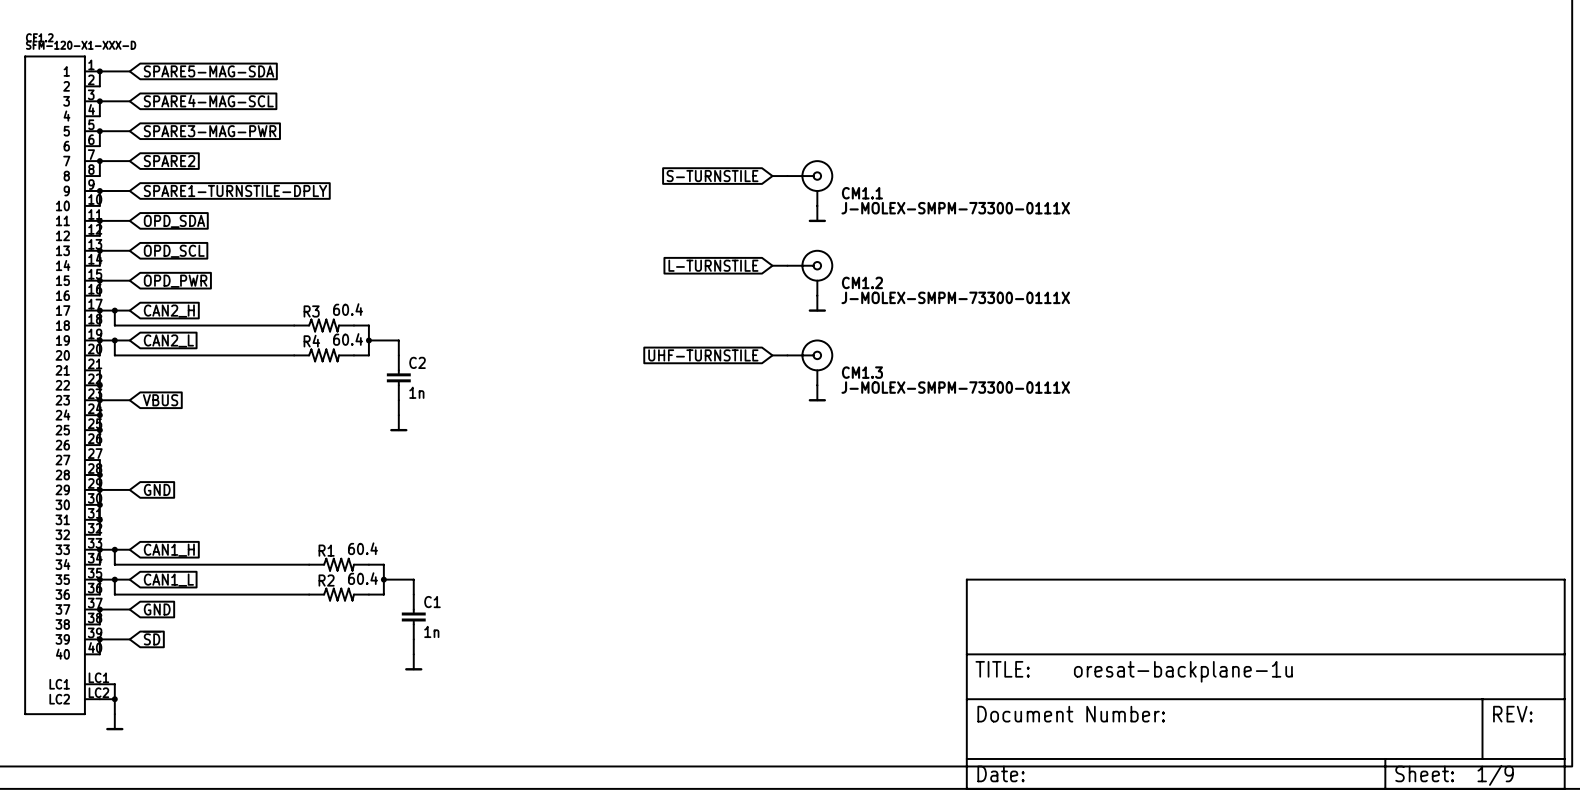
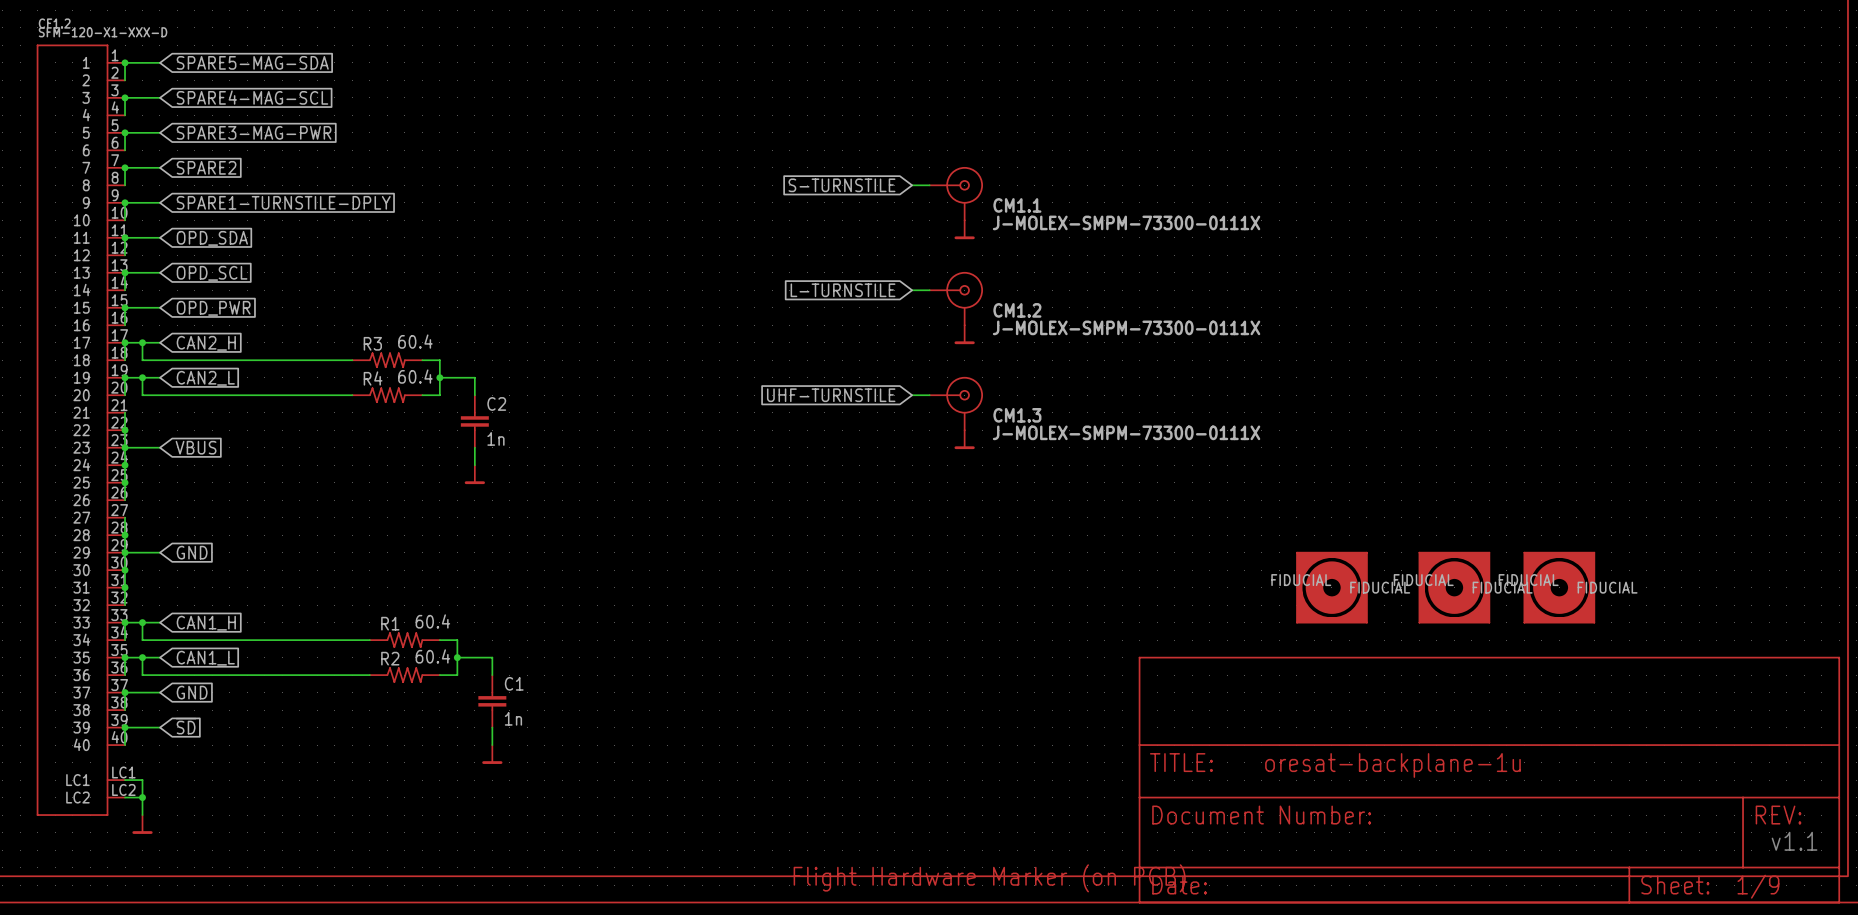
part: none -> (1331, 587)
part: none -> (1454, 587)
part: none -> (1559, 587)
text: none -> v1.1 (1794, 841)
part: none -> (989, 878)

